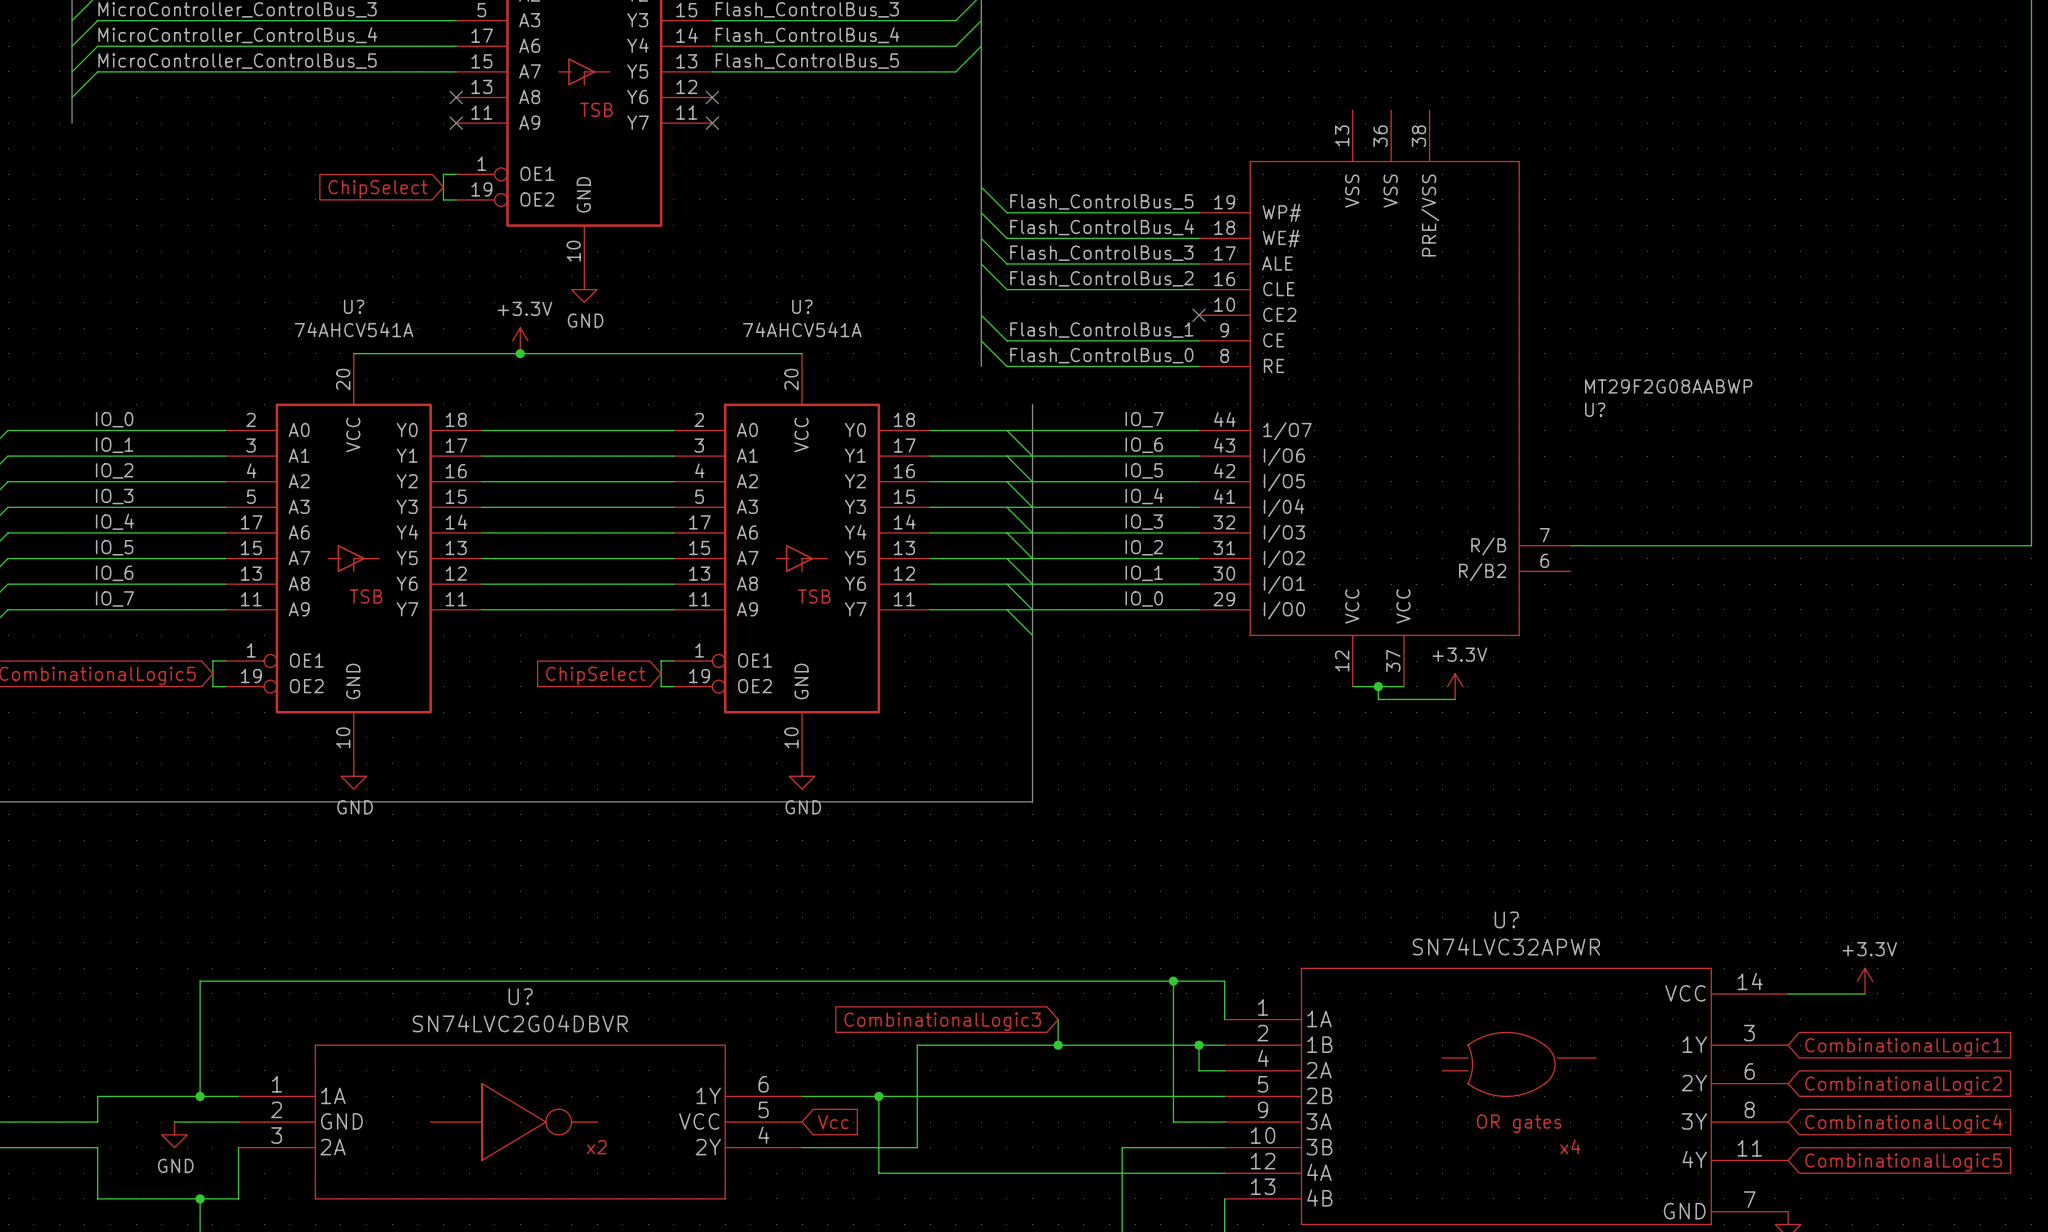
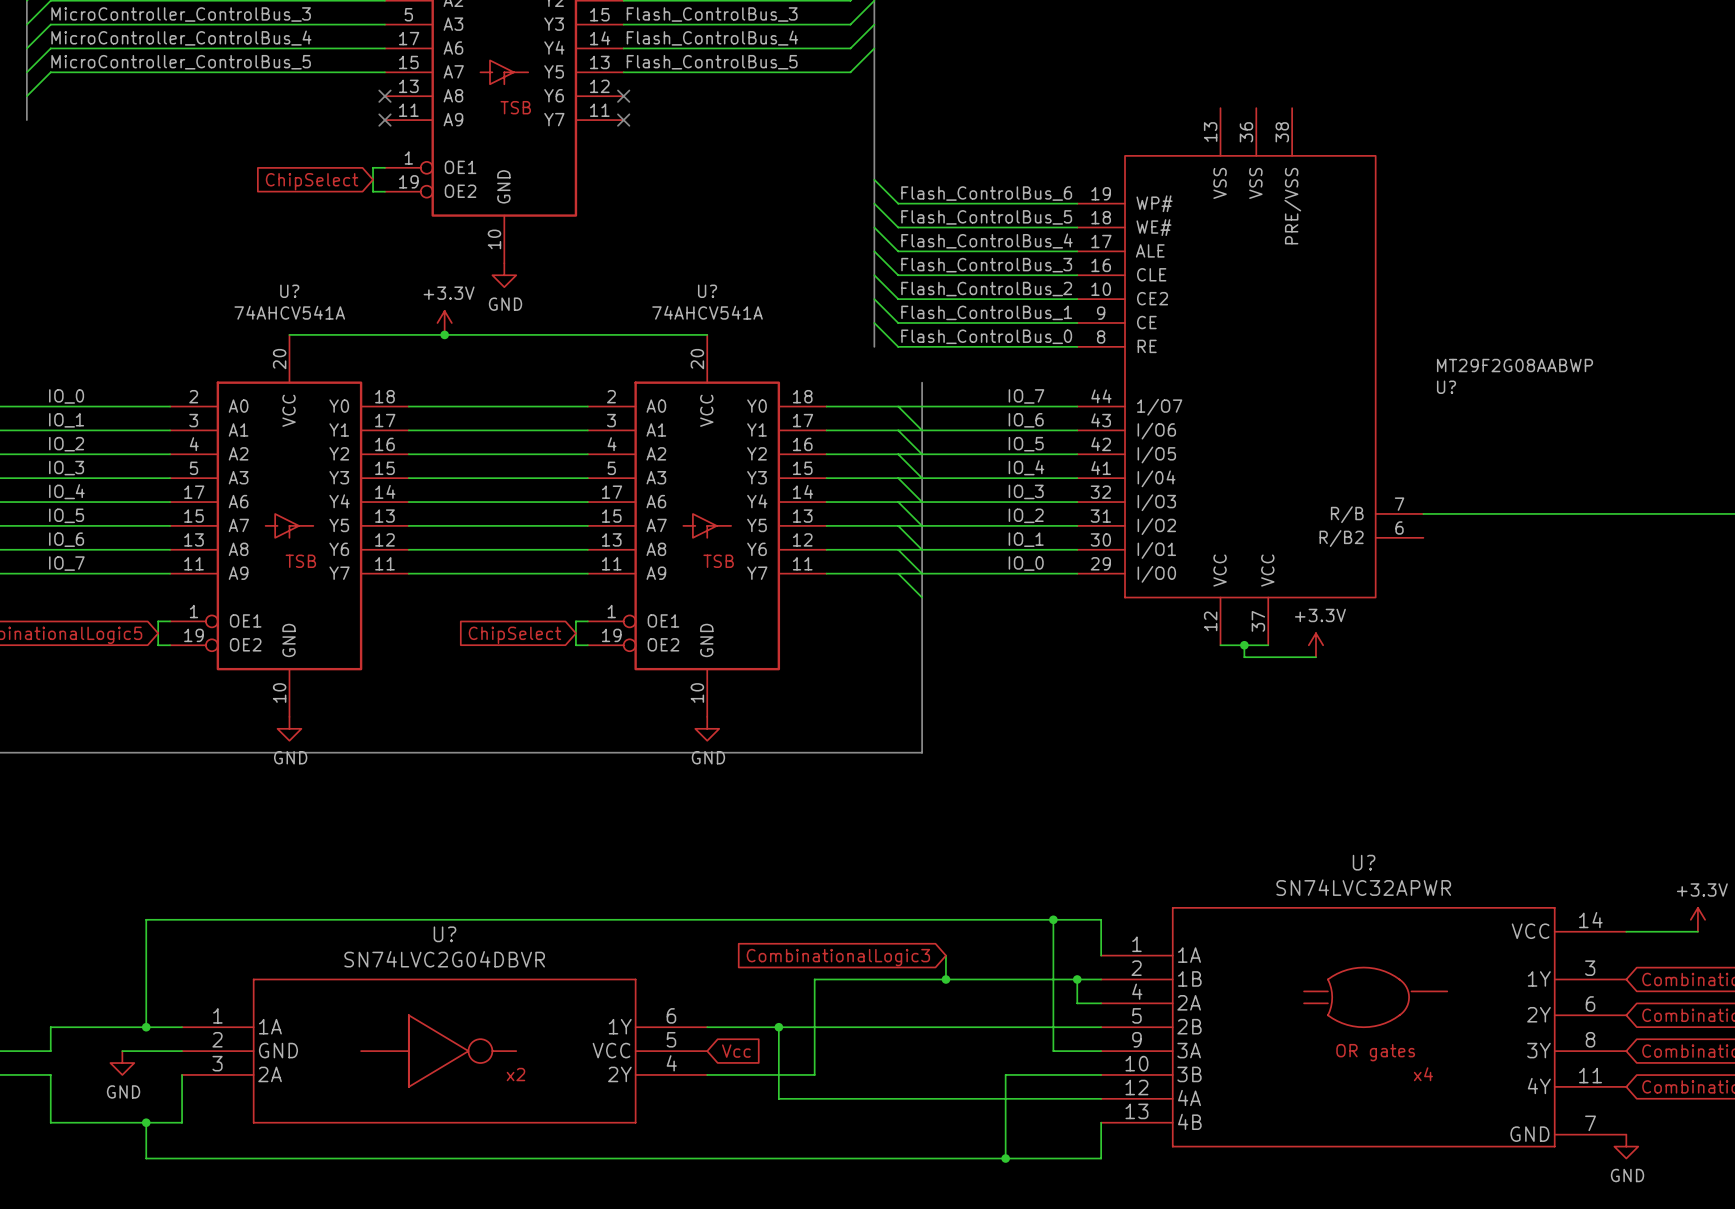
label: Flash_ControlBus_5 (1101, 201) -> Flash_ControlBus_6 (986, 193)
label: Flash_ControlBus_4 (1102, 227) -> Flash_ControlBus_5 (986, 217)
label: Flash_ControlBus_3 (1101, 253) -> Flash_ControlBus_4 (986, 241)
label: Flash_ControlBus_2 (1101, 278) -> Flash_ControlBus_3 (986, 265)
wire: none -> (874, 275) (898, 299) (1077, 299)
label: none -> Flash_ControlBus_2 (986, 289)
no-connect mark: (1199, 315) -> none

